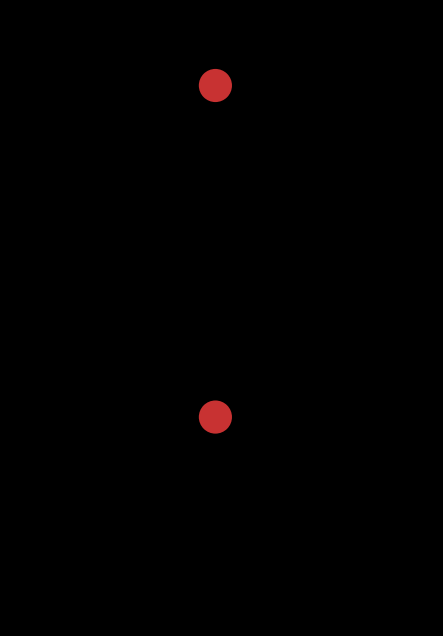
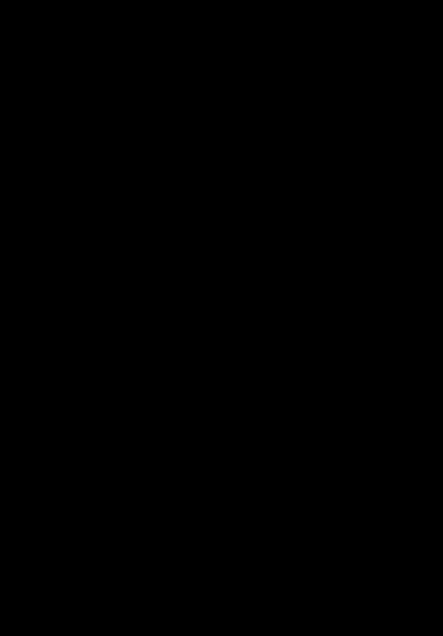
part: (215, 85) -> none
part: (215, 417) -> none

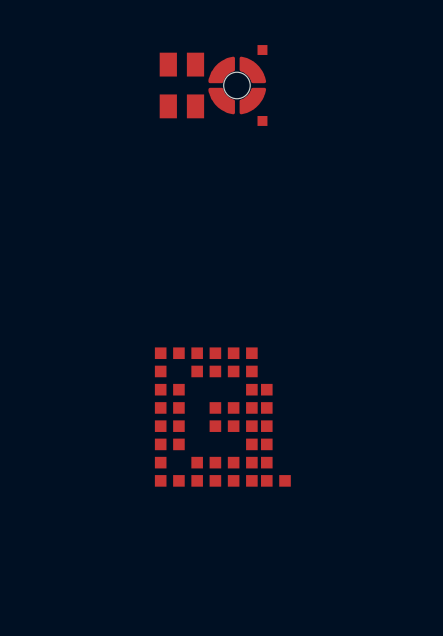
part: none -> (213, 85)
part: none -> (222, 417)

